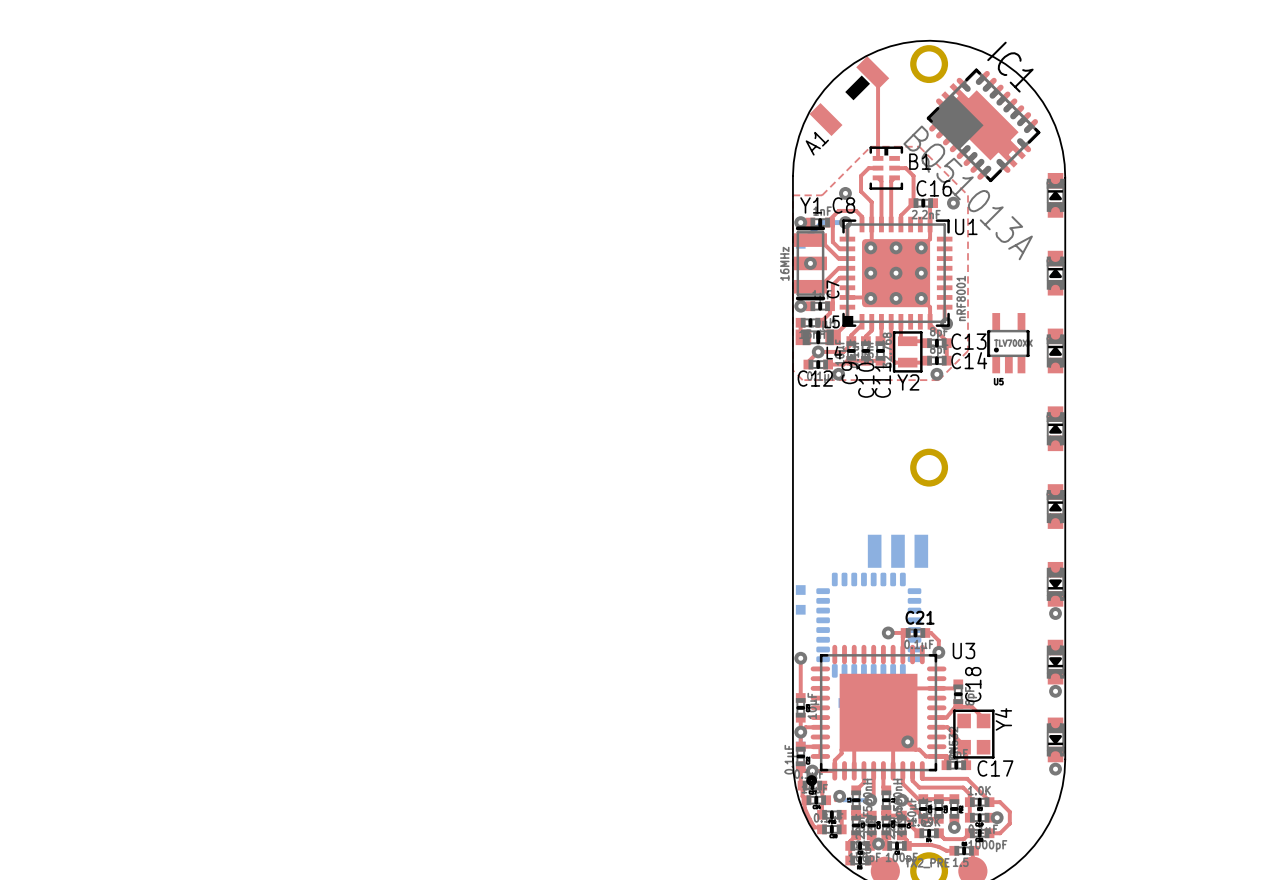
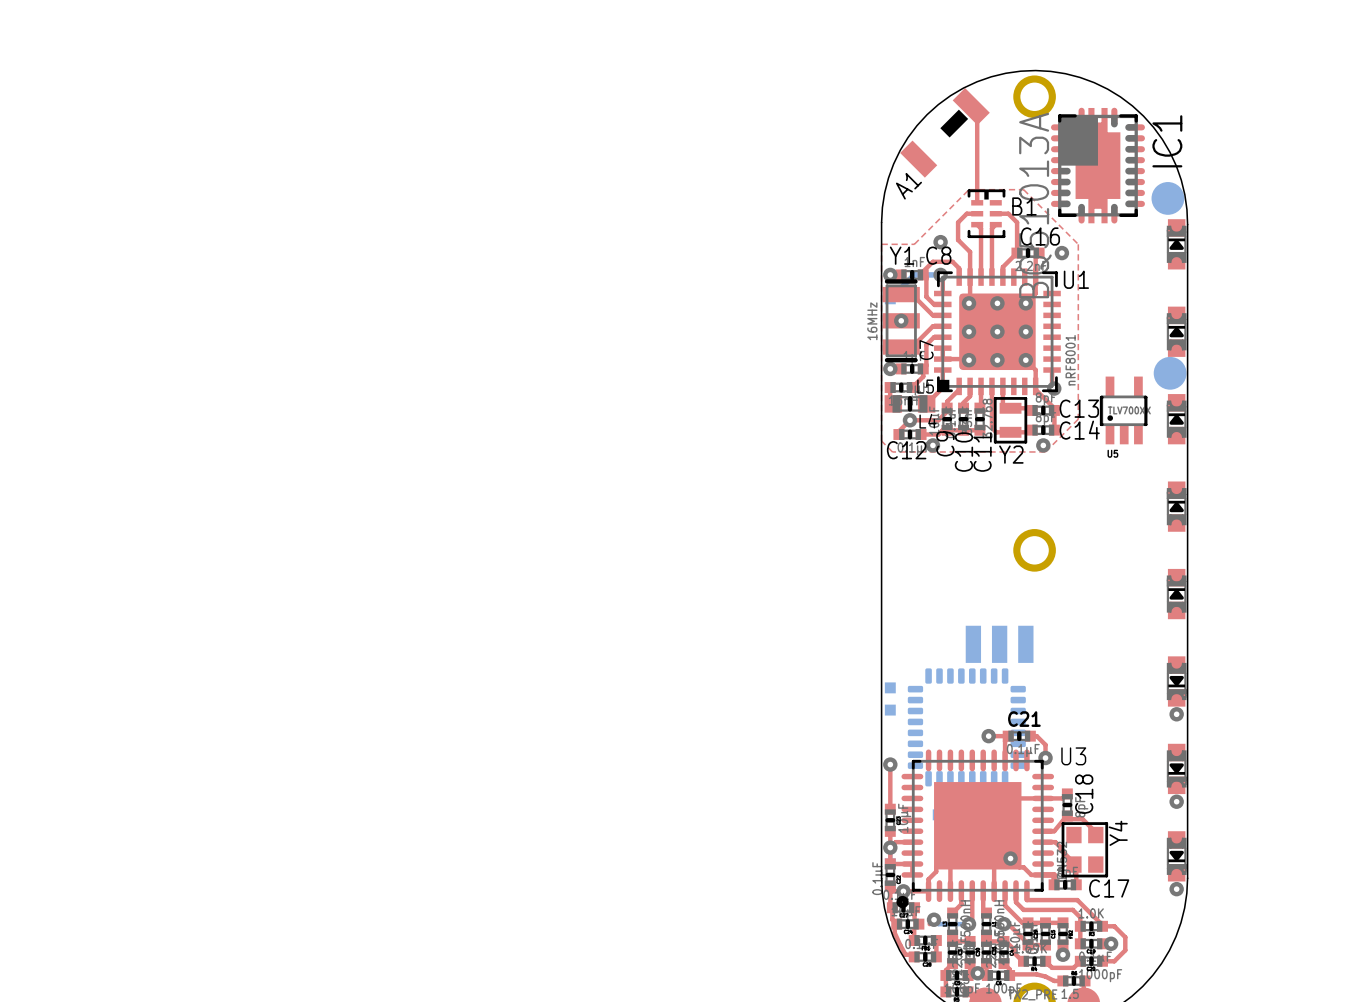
IC1 rotation: 0° (983, 125) -> 45° clockwise (1097, 165)
part: none -> (1167, 198)
part: none -> (1170, 373)

